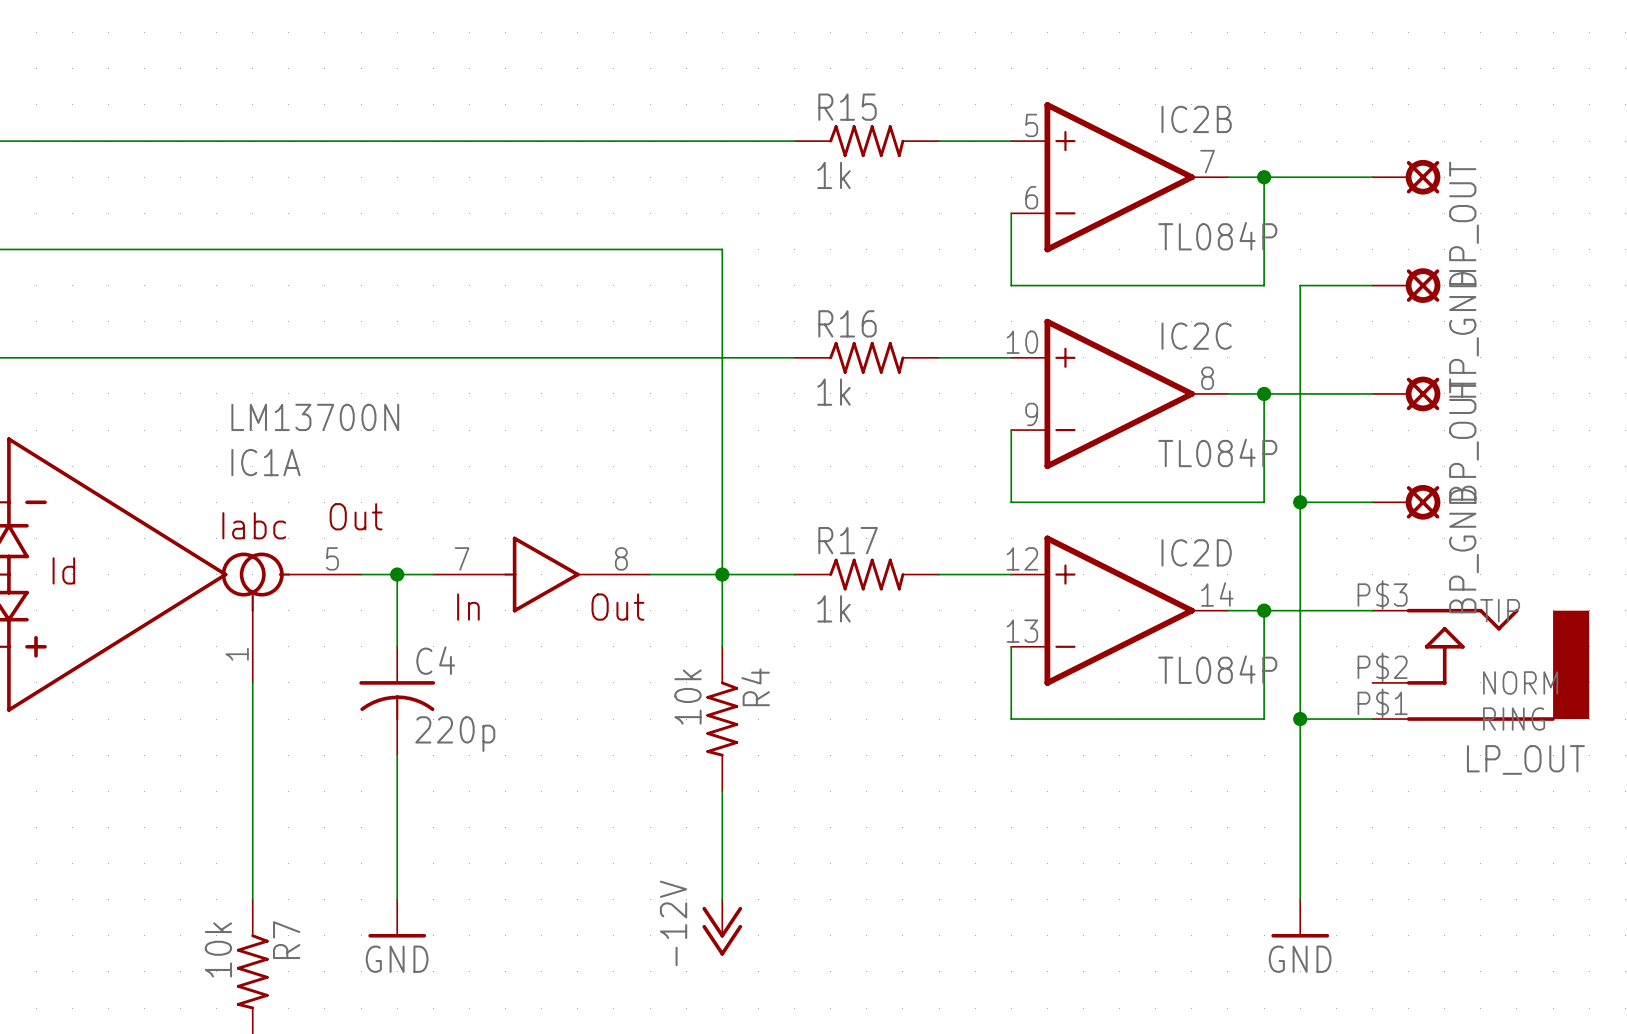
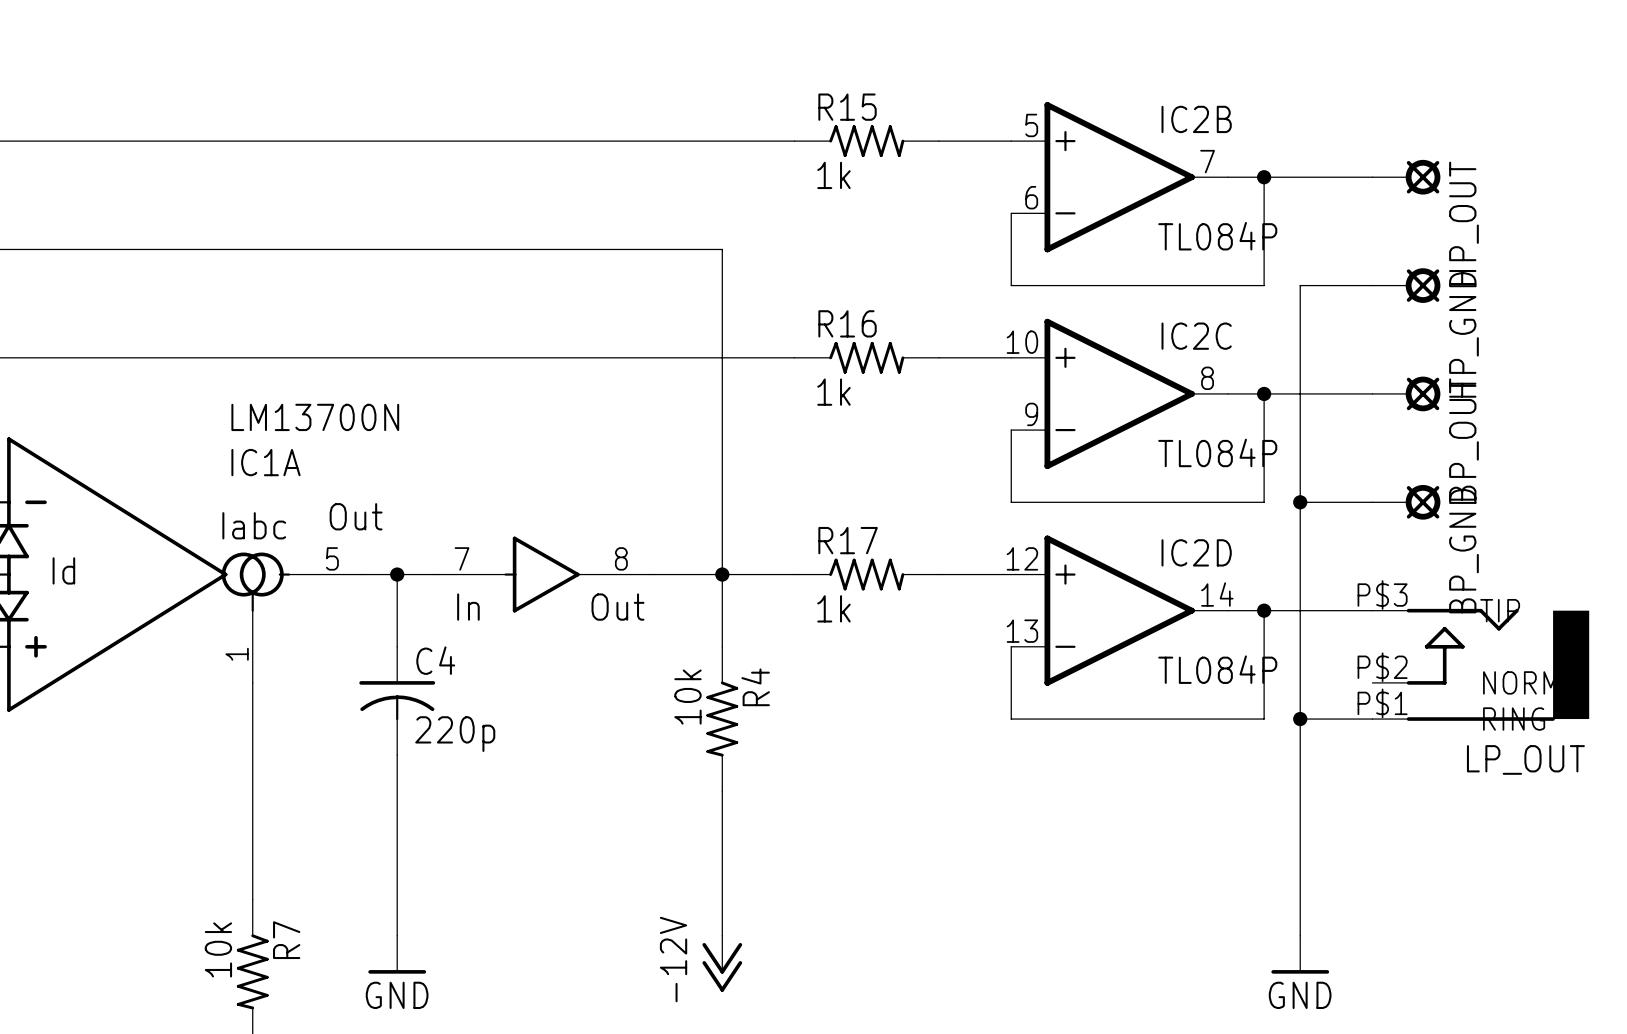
power symbol position: GND (397, 918) -> GND (397, 954)
power symbol position: GND (1300, 918) -> GND (1300, 954)
power symbol position: -12V (722, 927) -> -12V (722, 963)

